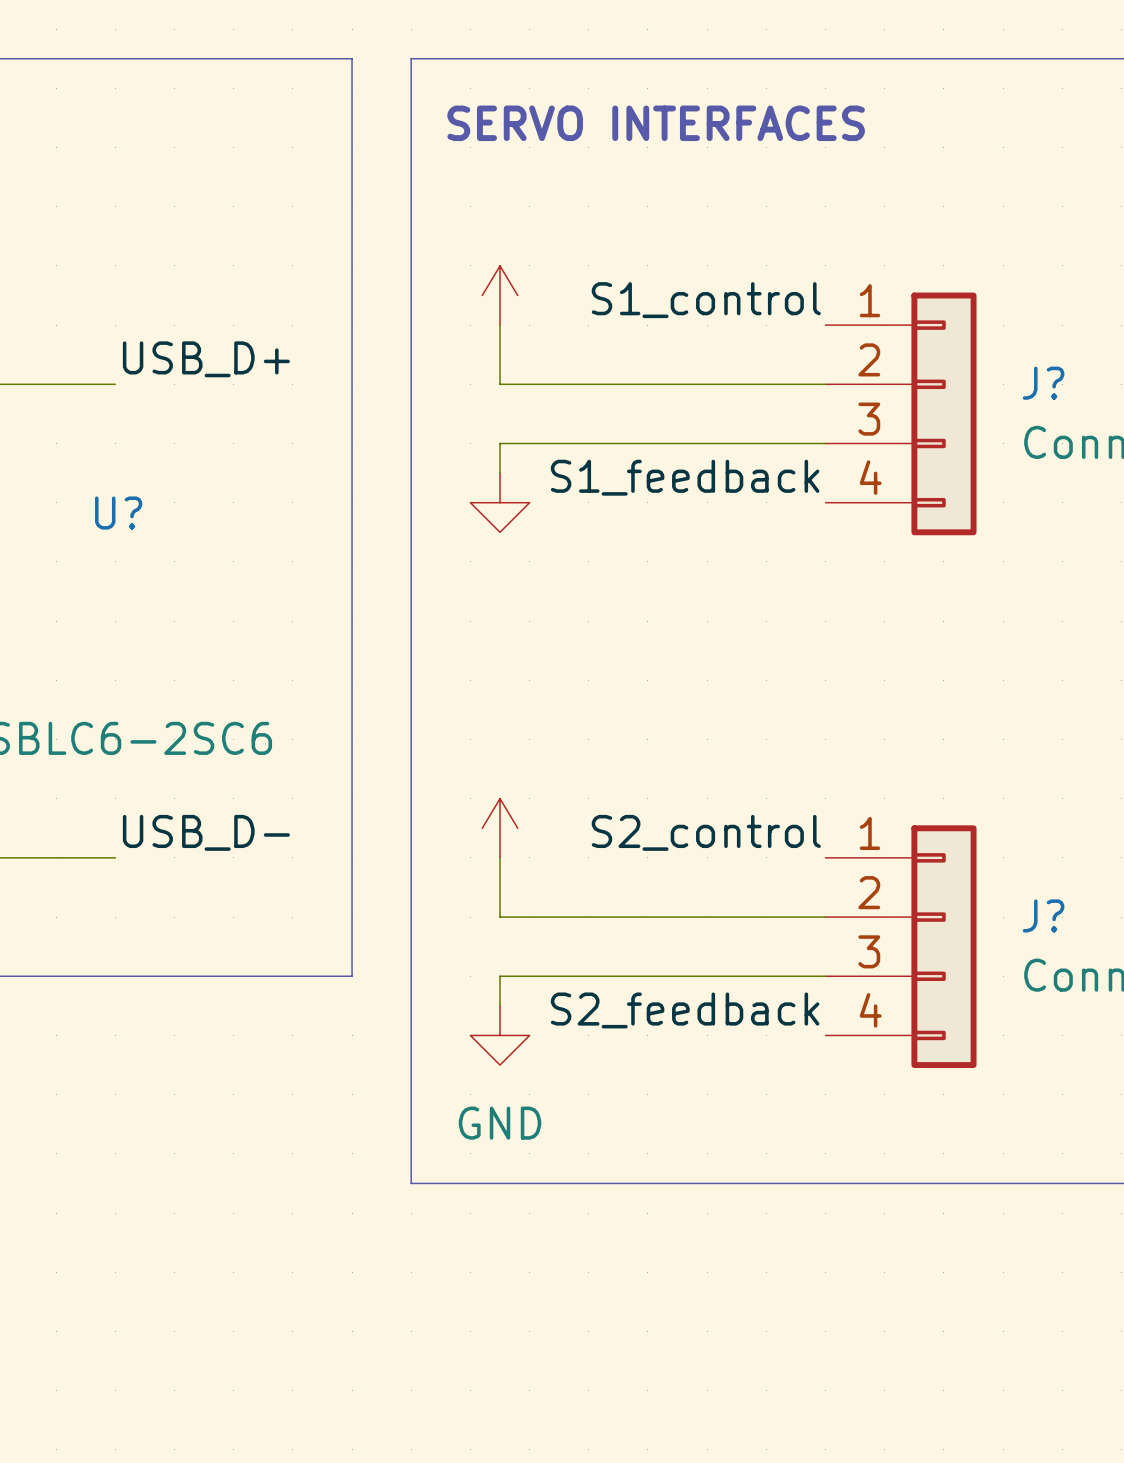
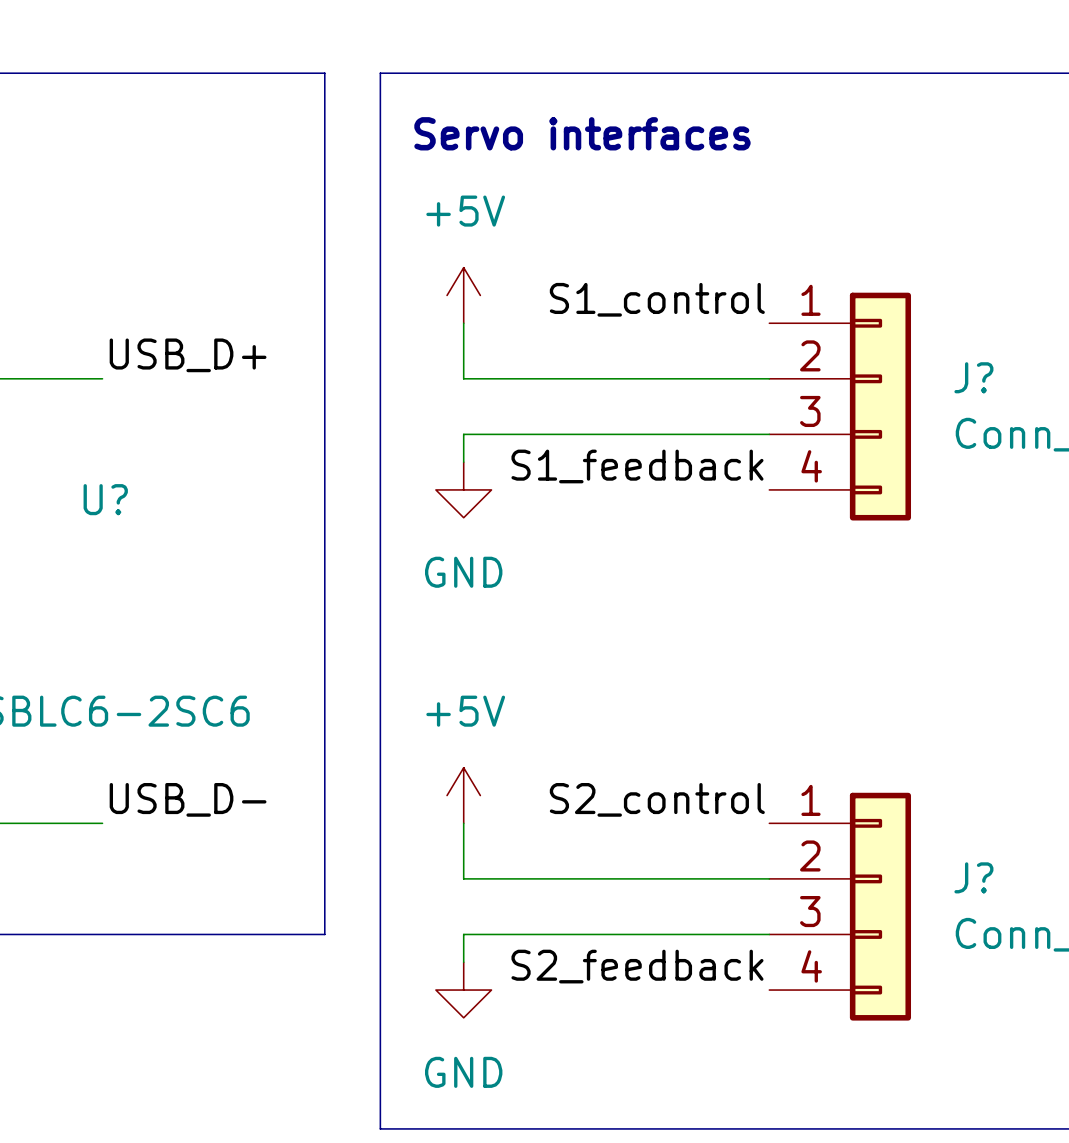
text: SERVO INTERFACES (656, 123) -> Servo interfaces (582, 133)
power symbol text: none -> +5V (465, 211)
power symbol text: none -> GND (463, 572)
power symbol text: none -> +5V (465, 711)

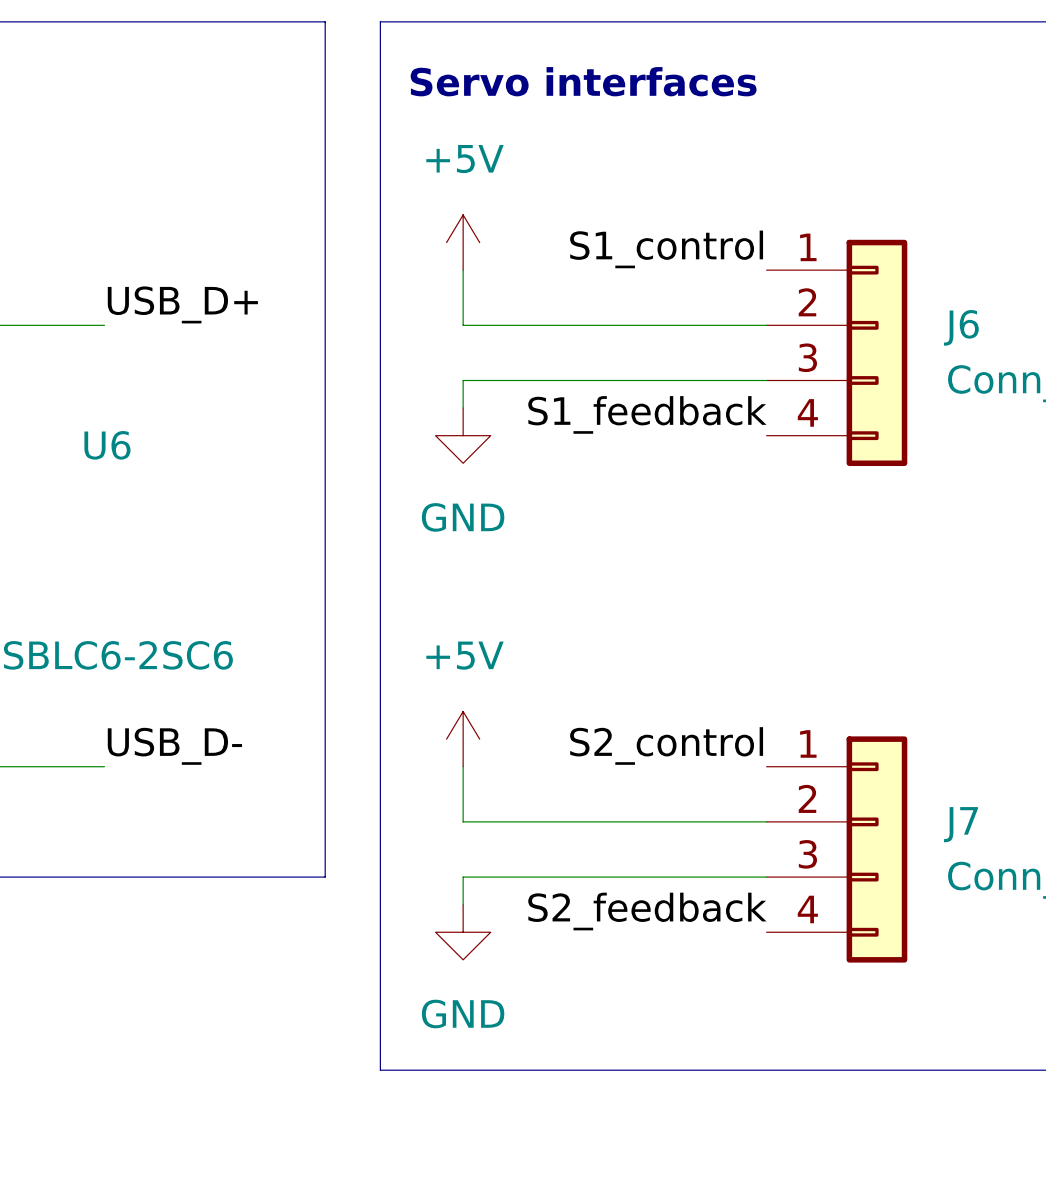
J? name: J? (973, 377) -> J6 (961, 327)
U? name: U? (105, 499) -> U6 (107, 445)
J? name: J? (973, 877) -> J7 (960, 824)

